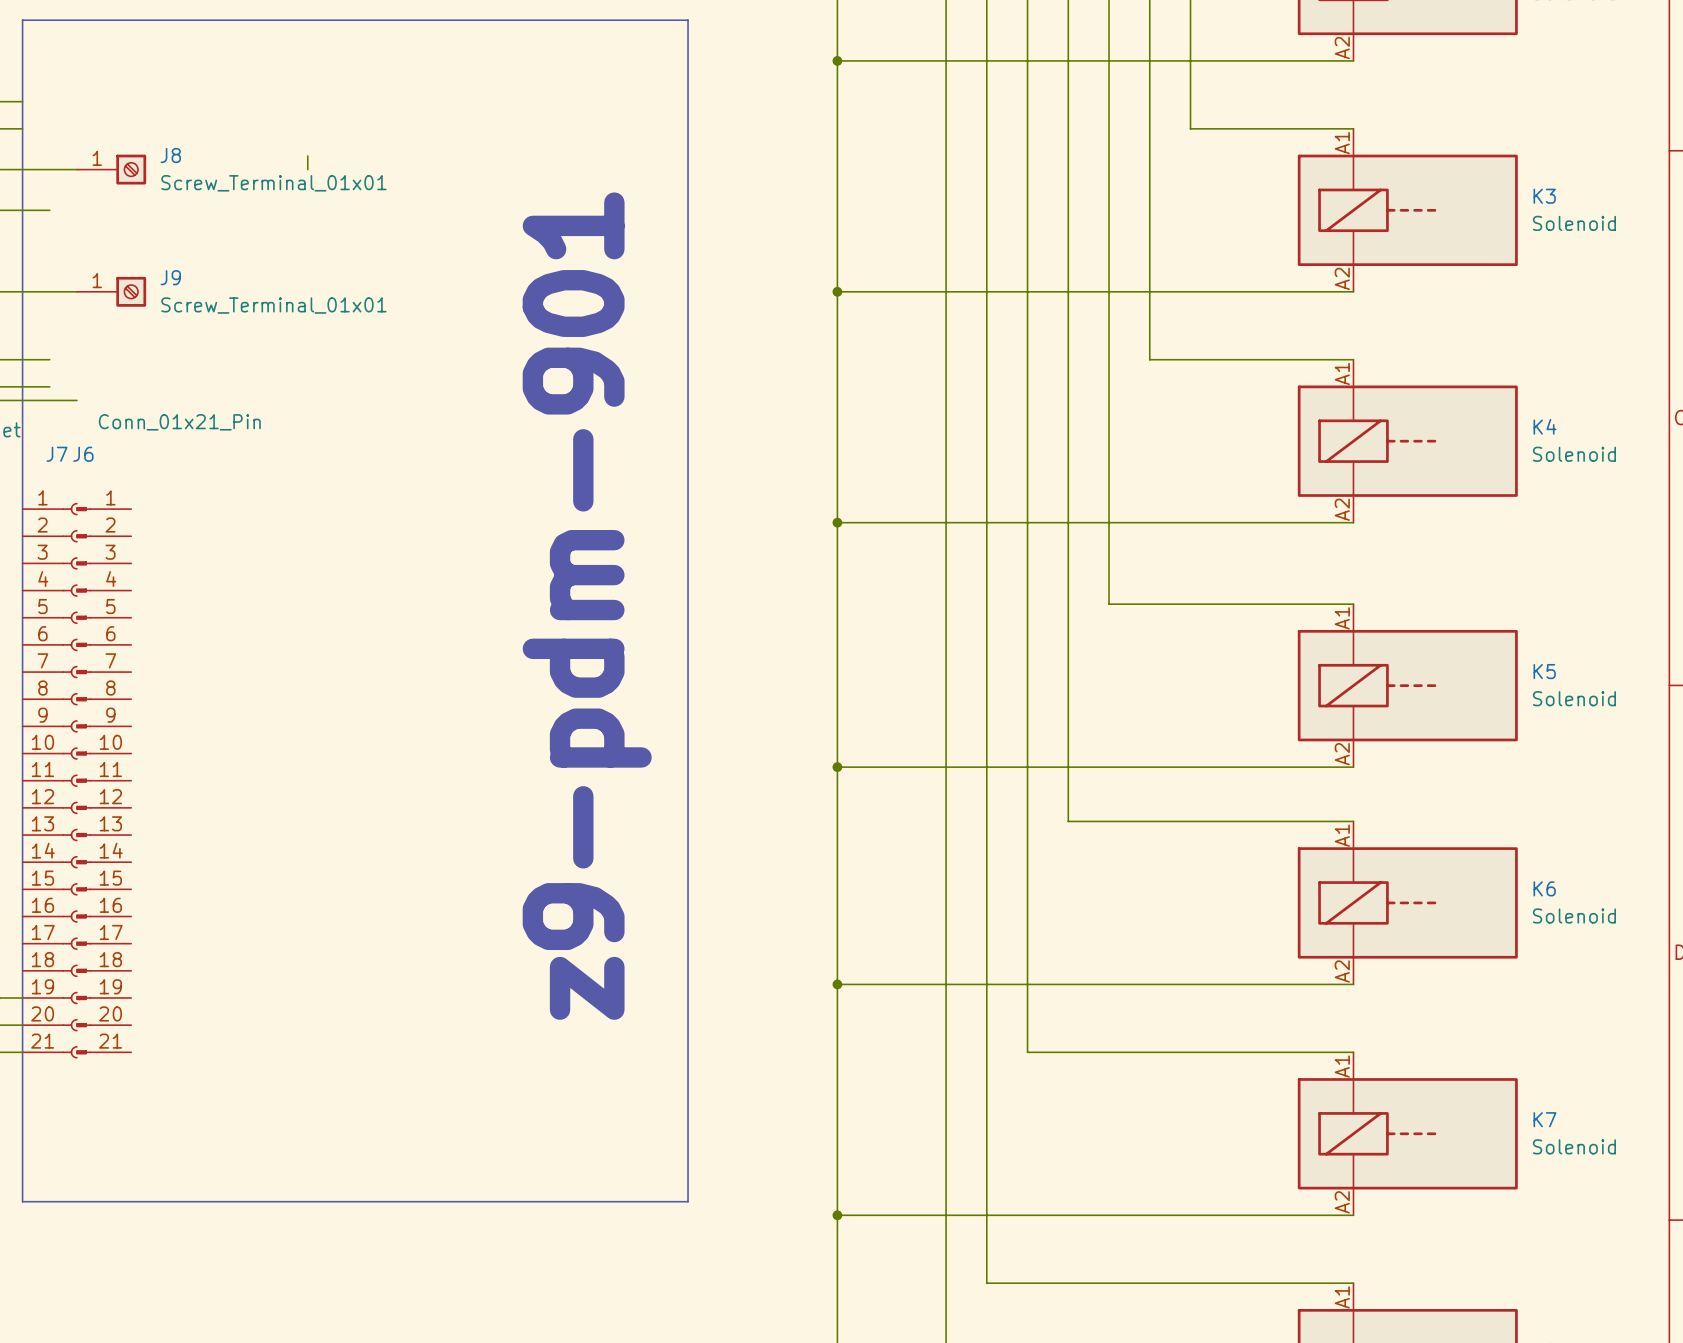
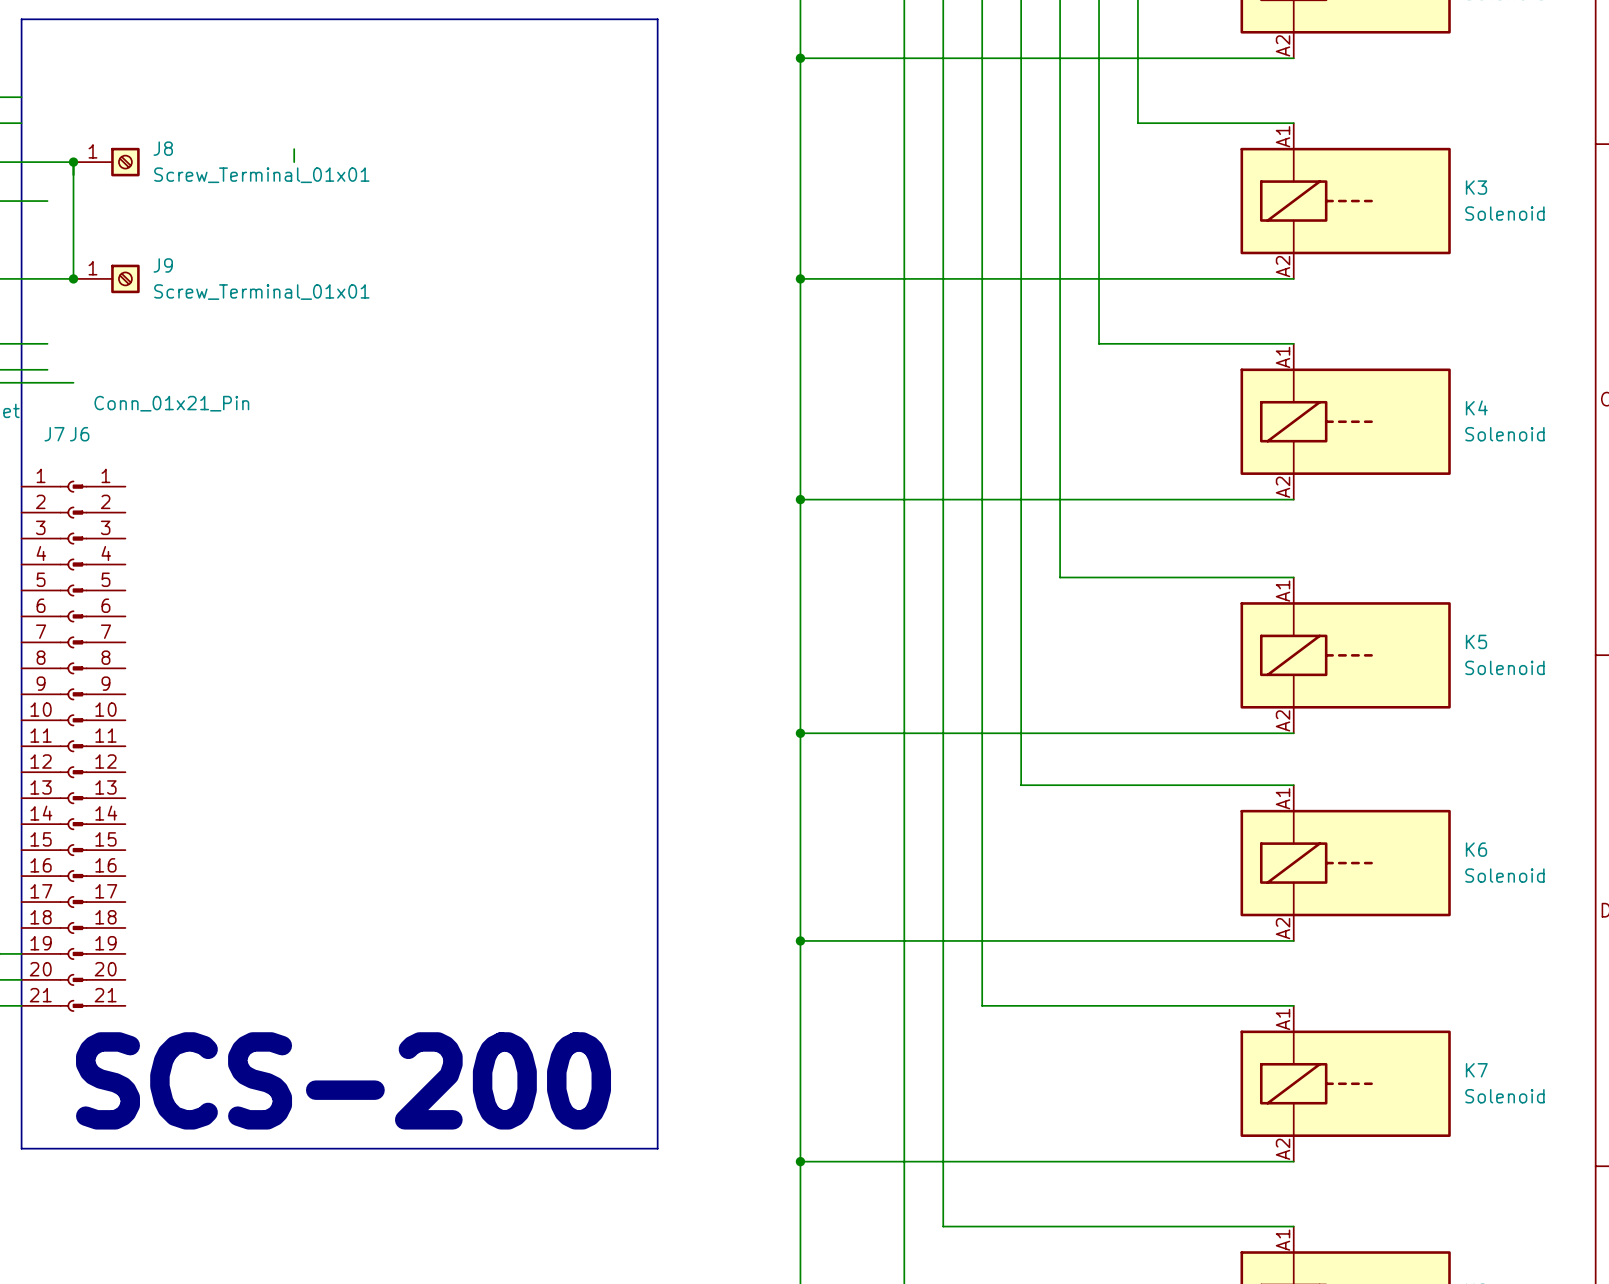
wire: none -> (73, 162) (73, 278)
junction: none -> (73, 162)
junction: none -> (73, 278)
text: z9-pdm-901 (587, 606) -> none
text: none -> SCS-200 (343, 1080)

